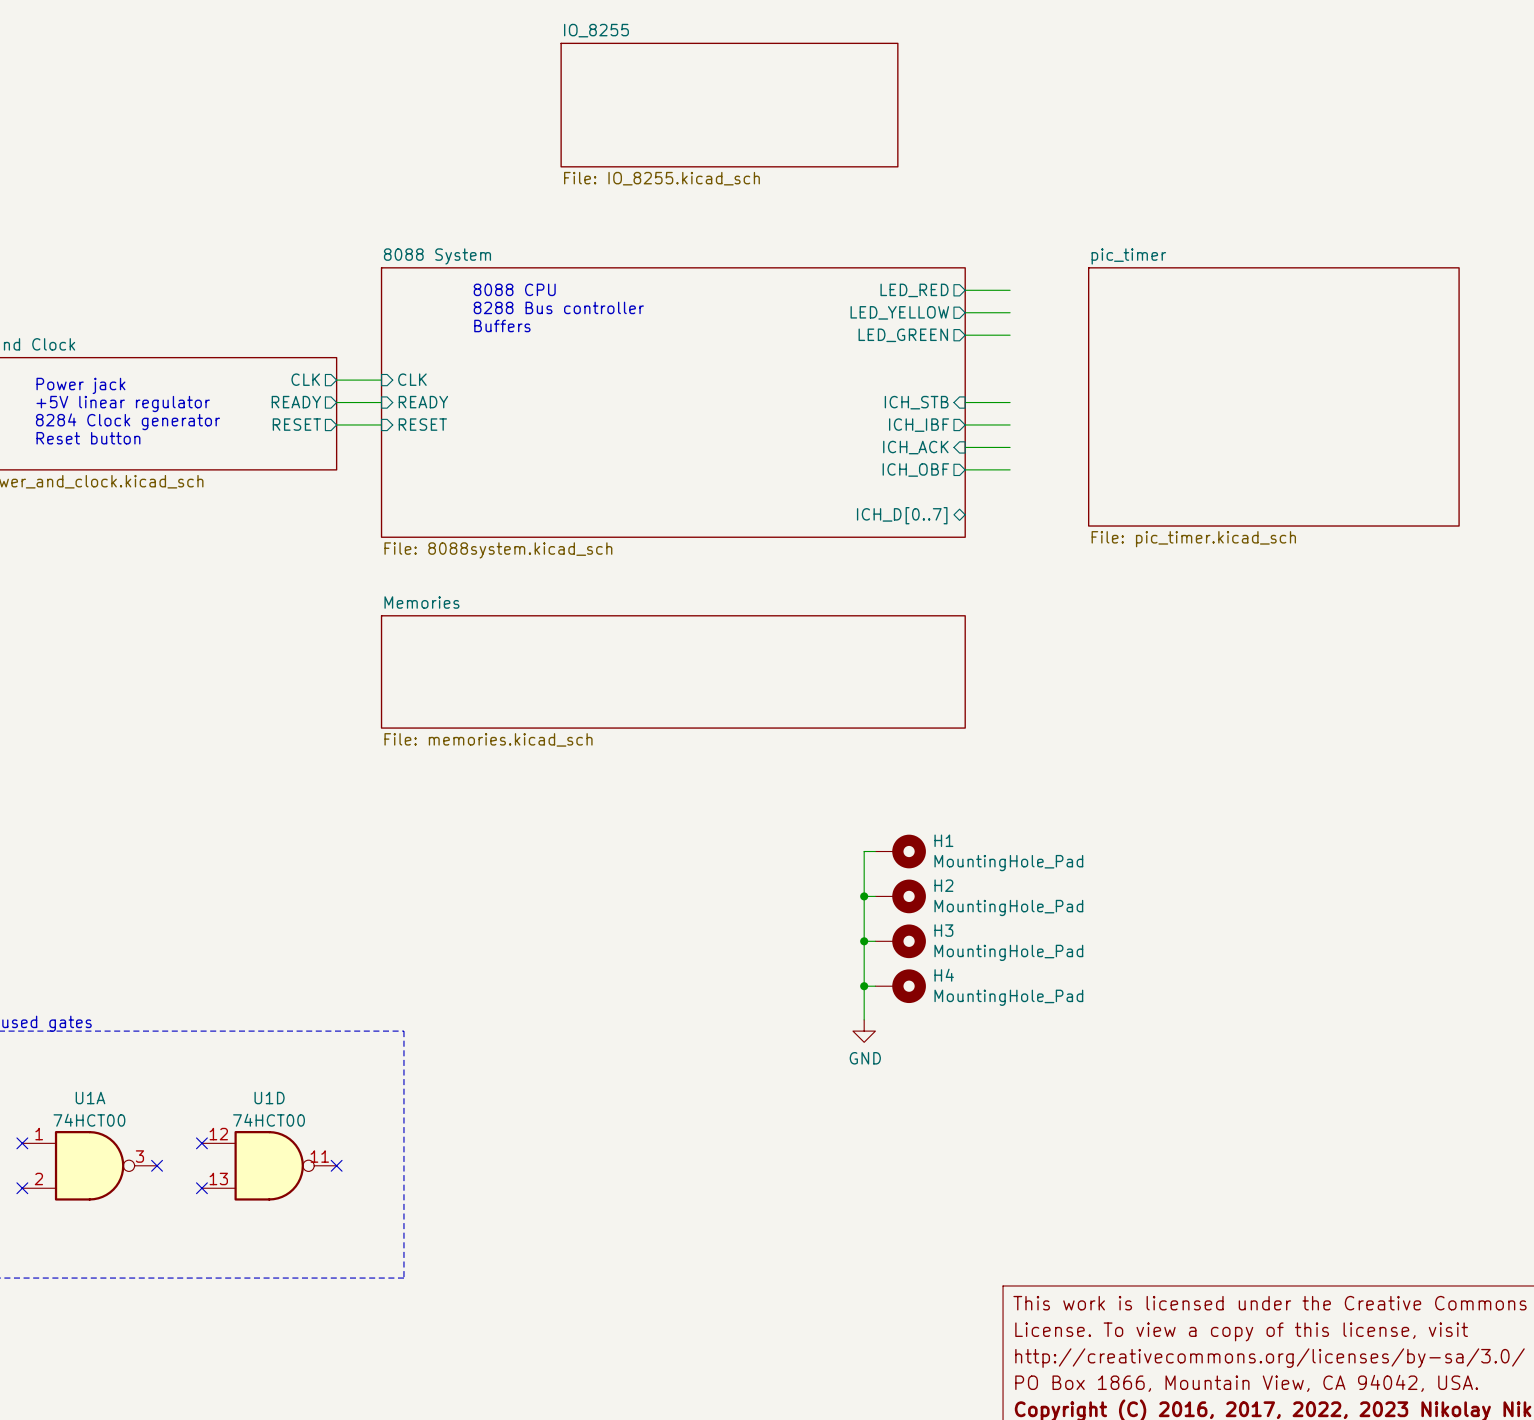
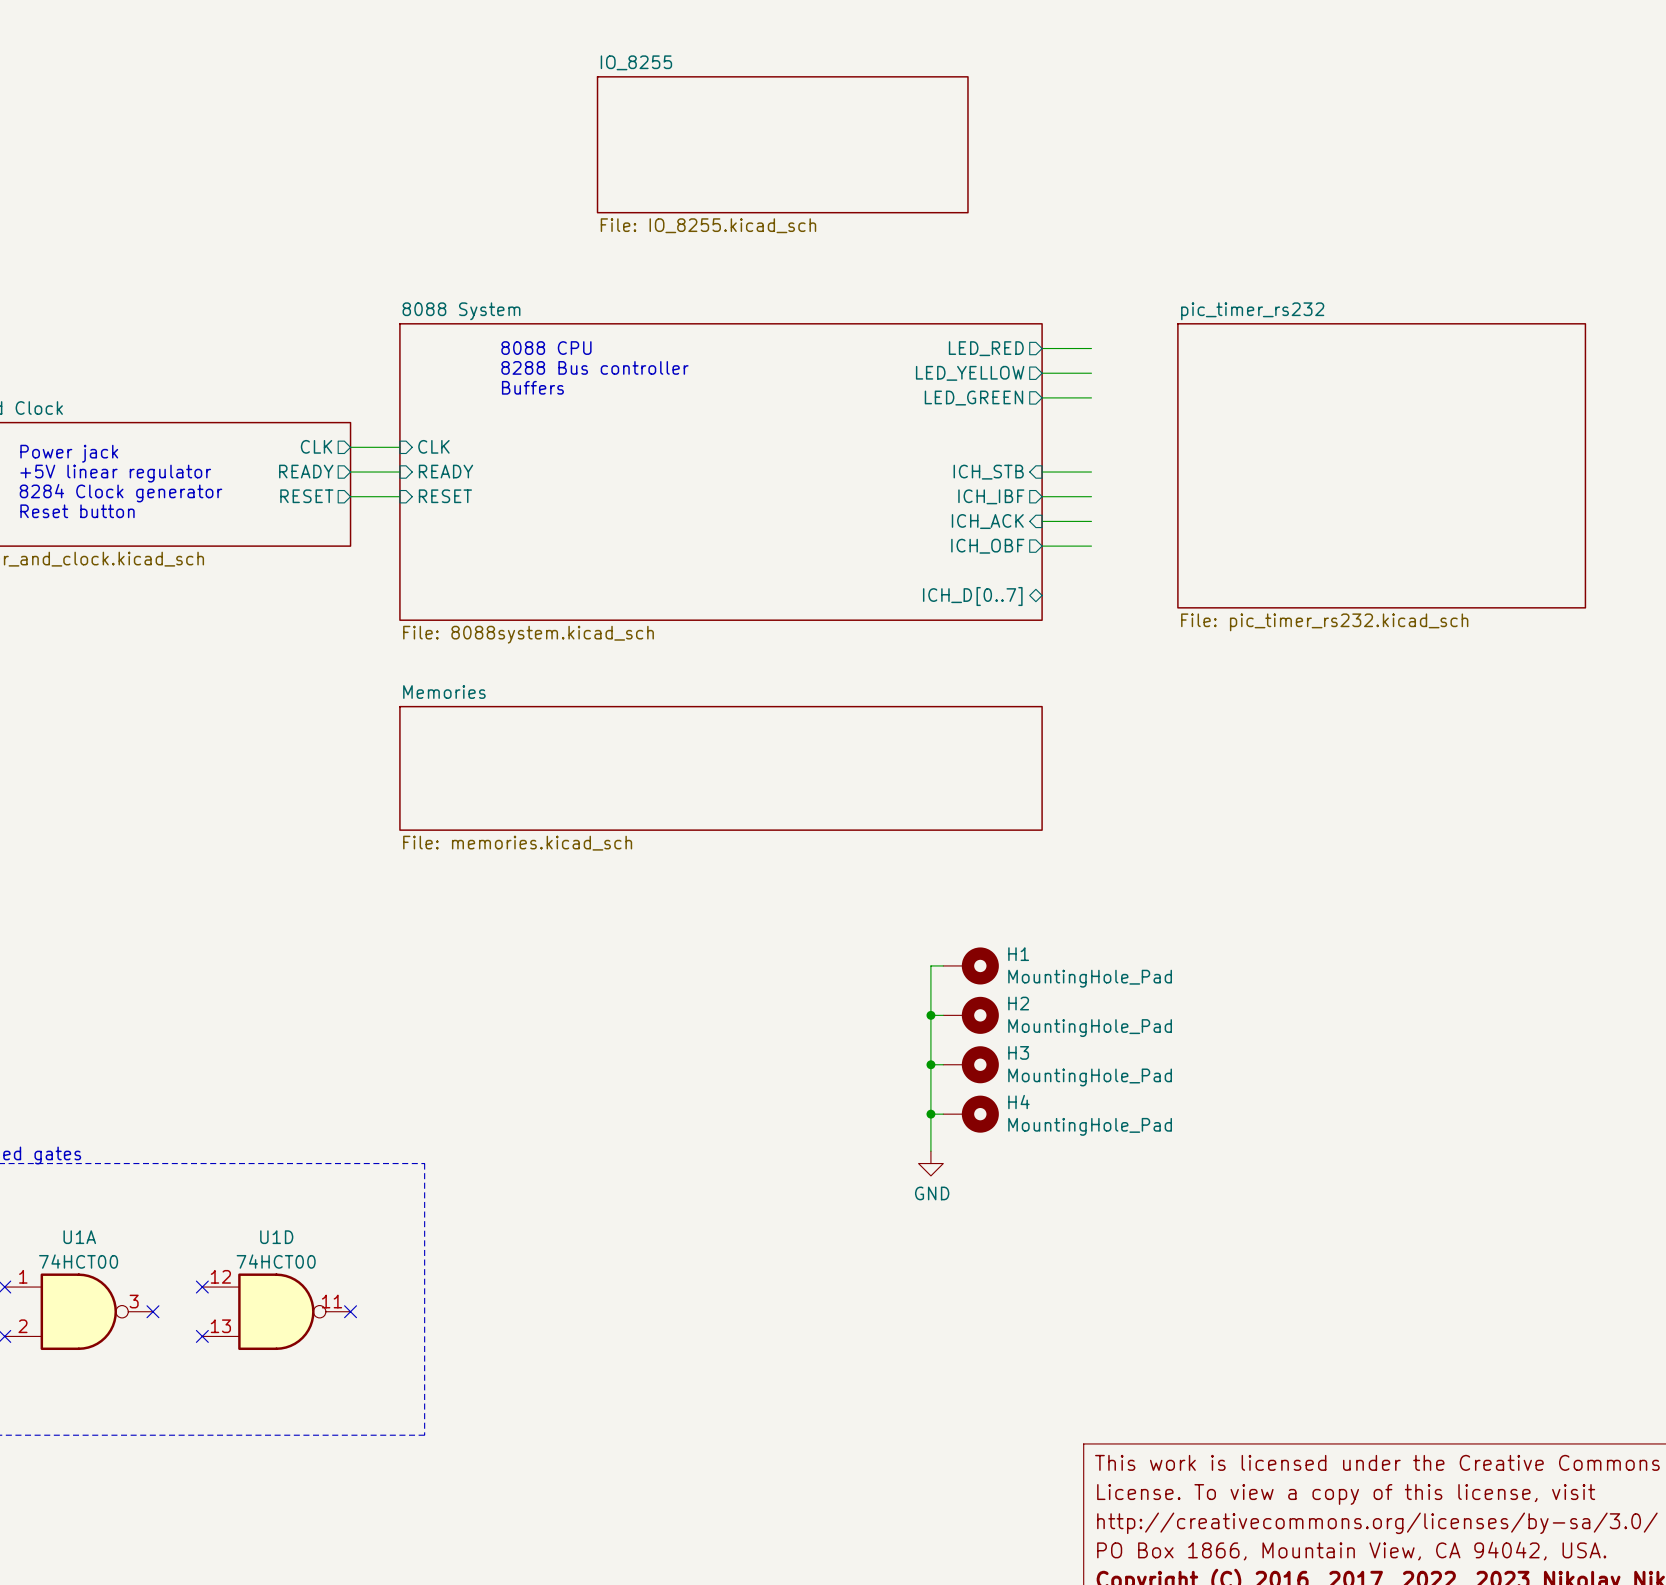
sheet pic_timer name: pic_timer (1128, 256) -> pic_timer_rs232 (1252, 311)
sheet pic_timer value: File: pic_timer.kicad_sch (1193, 539) -> File: pic_timer_rs232.kicad_sch (1324, 622)

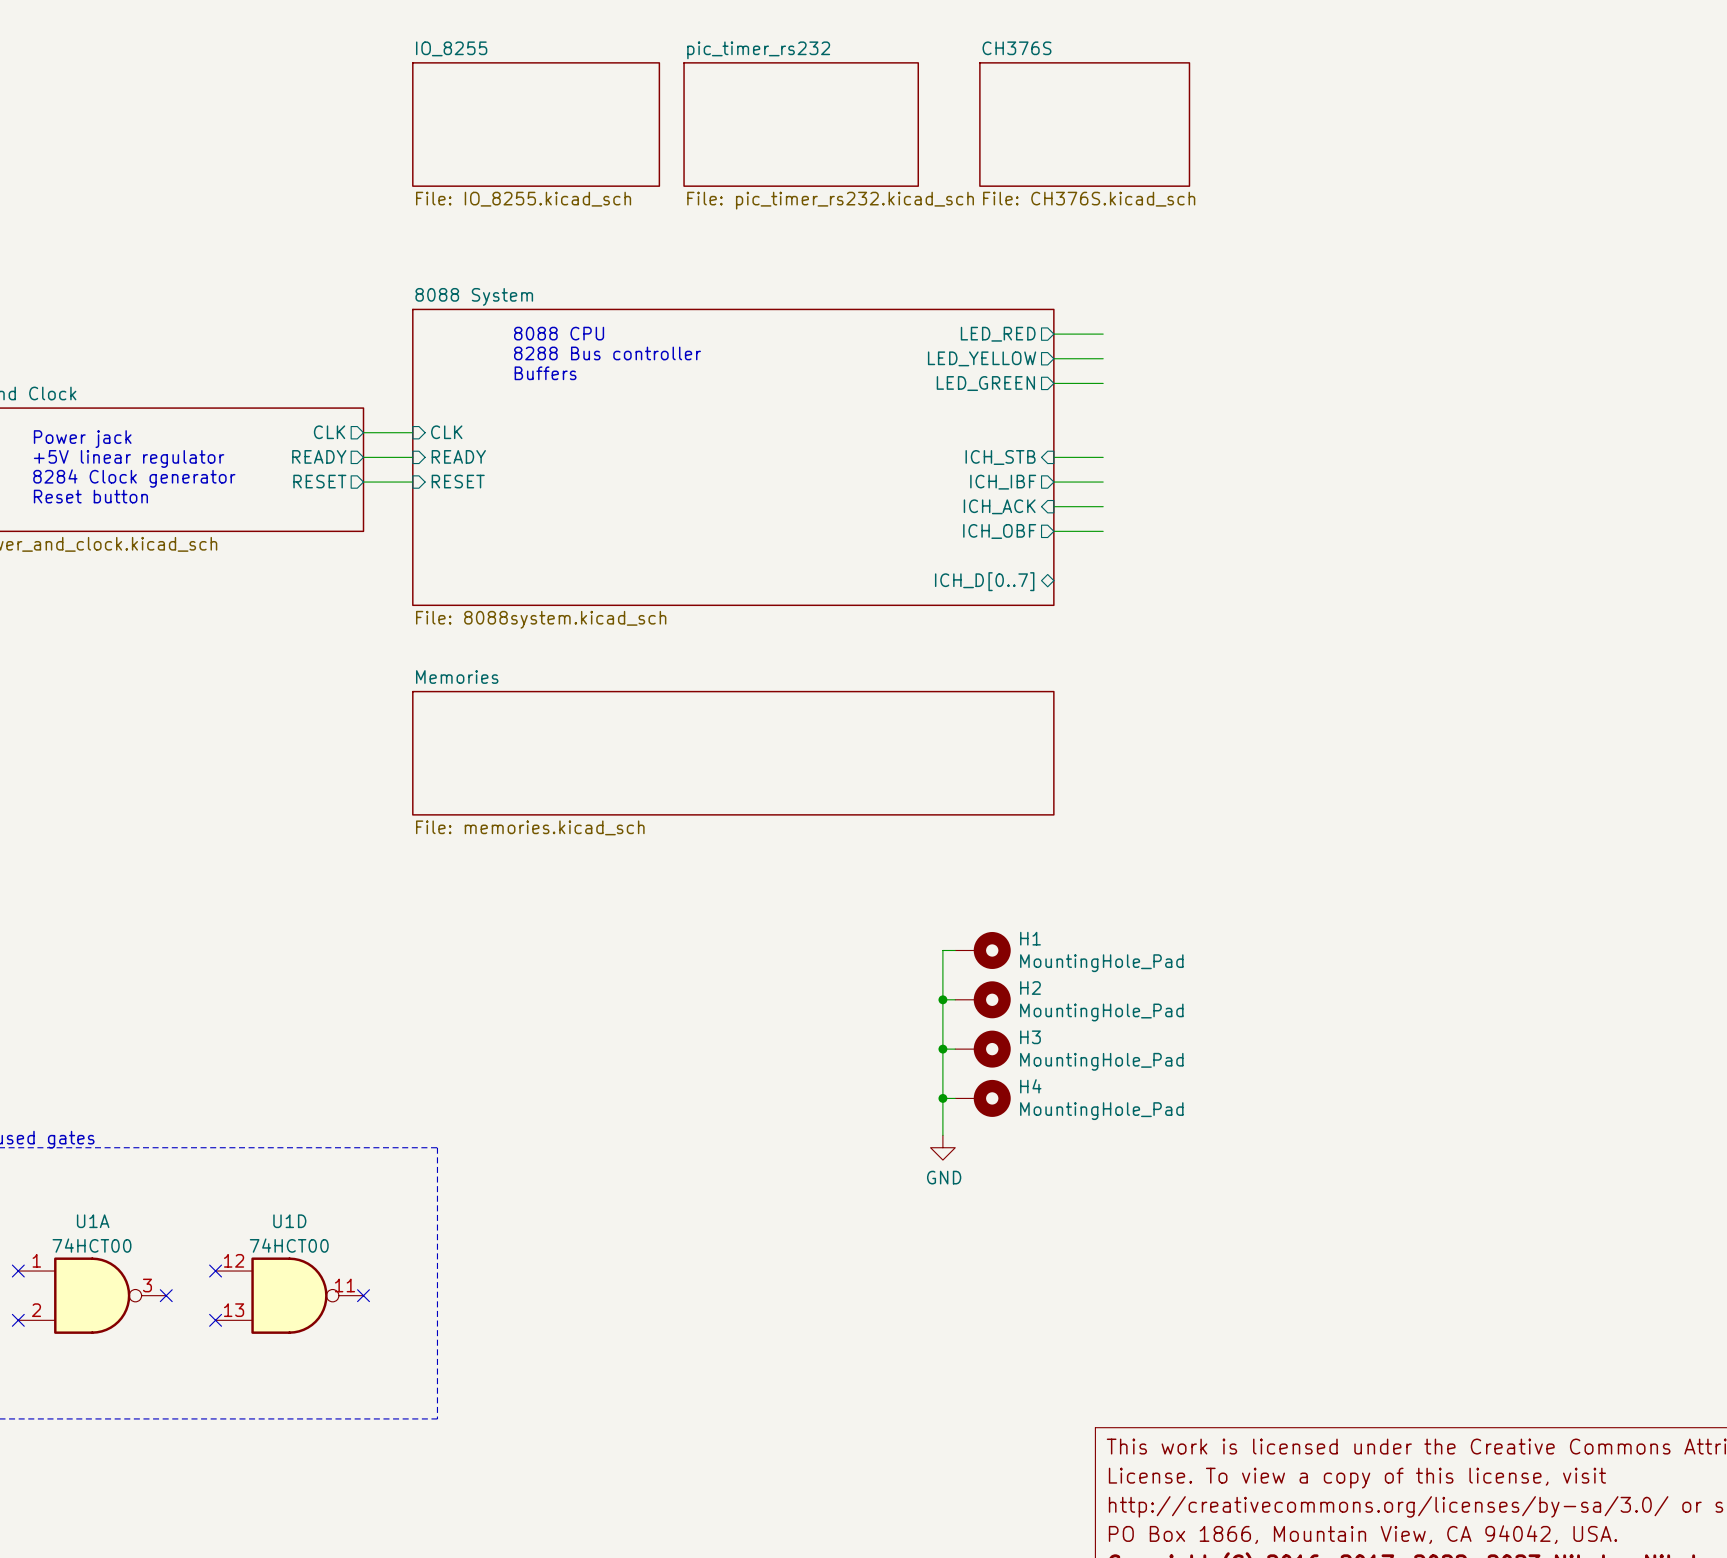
sheet IO_8255 name position: IO_8255 (636, 62) -> IO_8255 (451, 48)
sheet IO_8255 shape: [596, 76, 969, 214] -> [412, 62, 661, 187]
sheet CH376S: none -> File: CH376S.kicad_sch (1084, 124)
sheet IO_8255 value position: File: IO_8255.kicad_sch (708, 225) -> File: IO_8255.kicad_sch (523, 199)
sheet pic_timer_rs232 name position: pic_timer_rs232 (1252, 311) -> pic_timer_rs232 (758, 50)
sheet pic_timer_rs232 shape: [1177, 323, 1587, 609] -> [683, 62, 920, 187]
sheet pic_timer_rs232 value position: File: pic_timer_rs232.kicad_sch (1324, 622) -> File: pic_timer_rs232.kicad_sch (830, 200)

